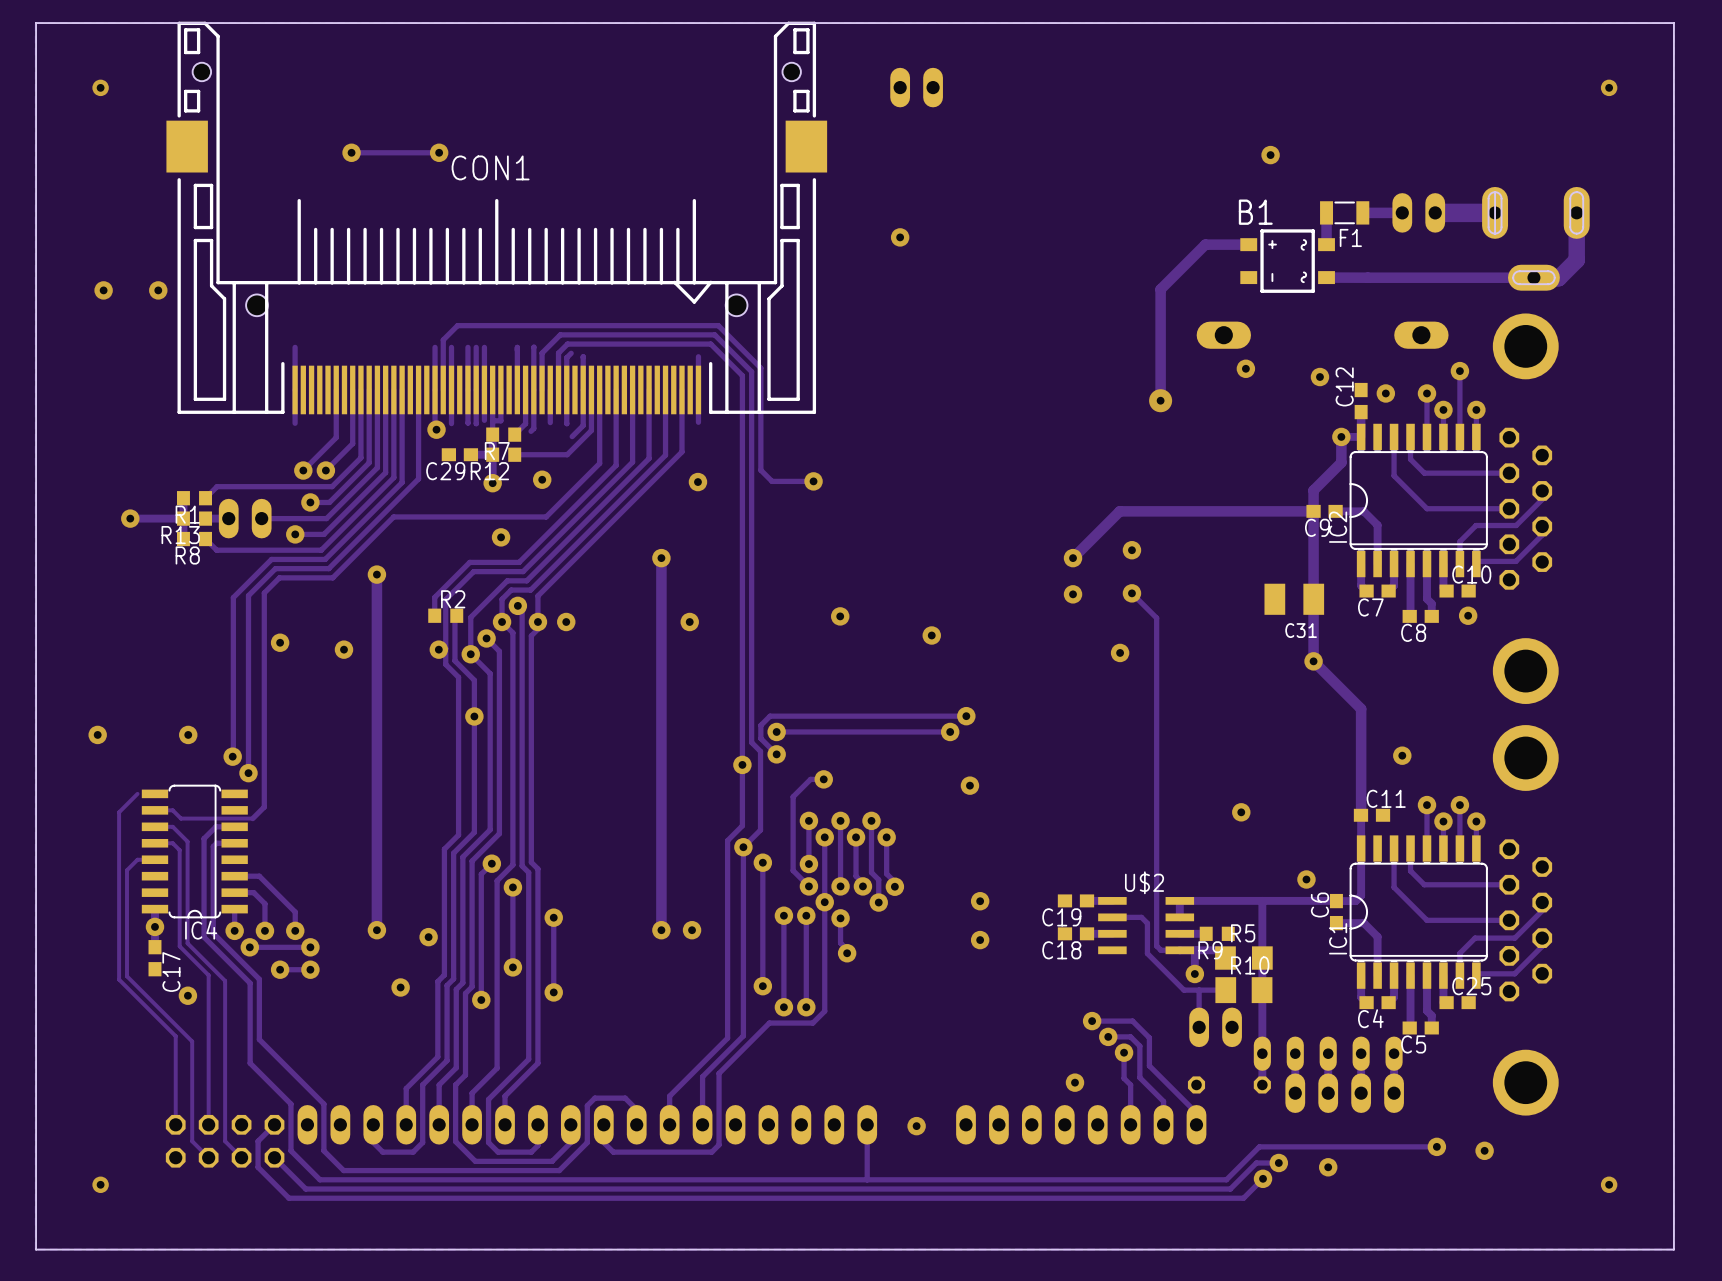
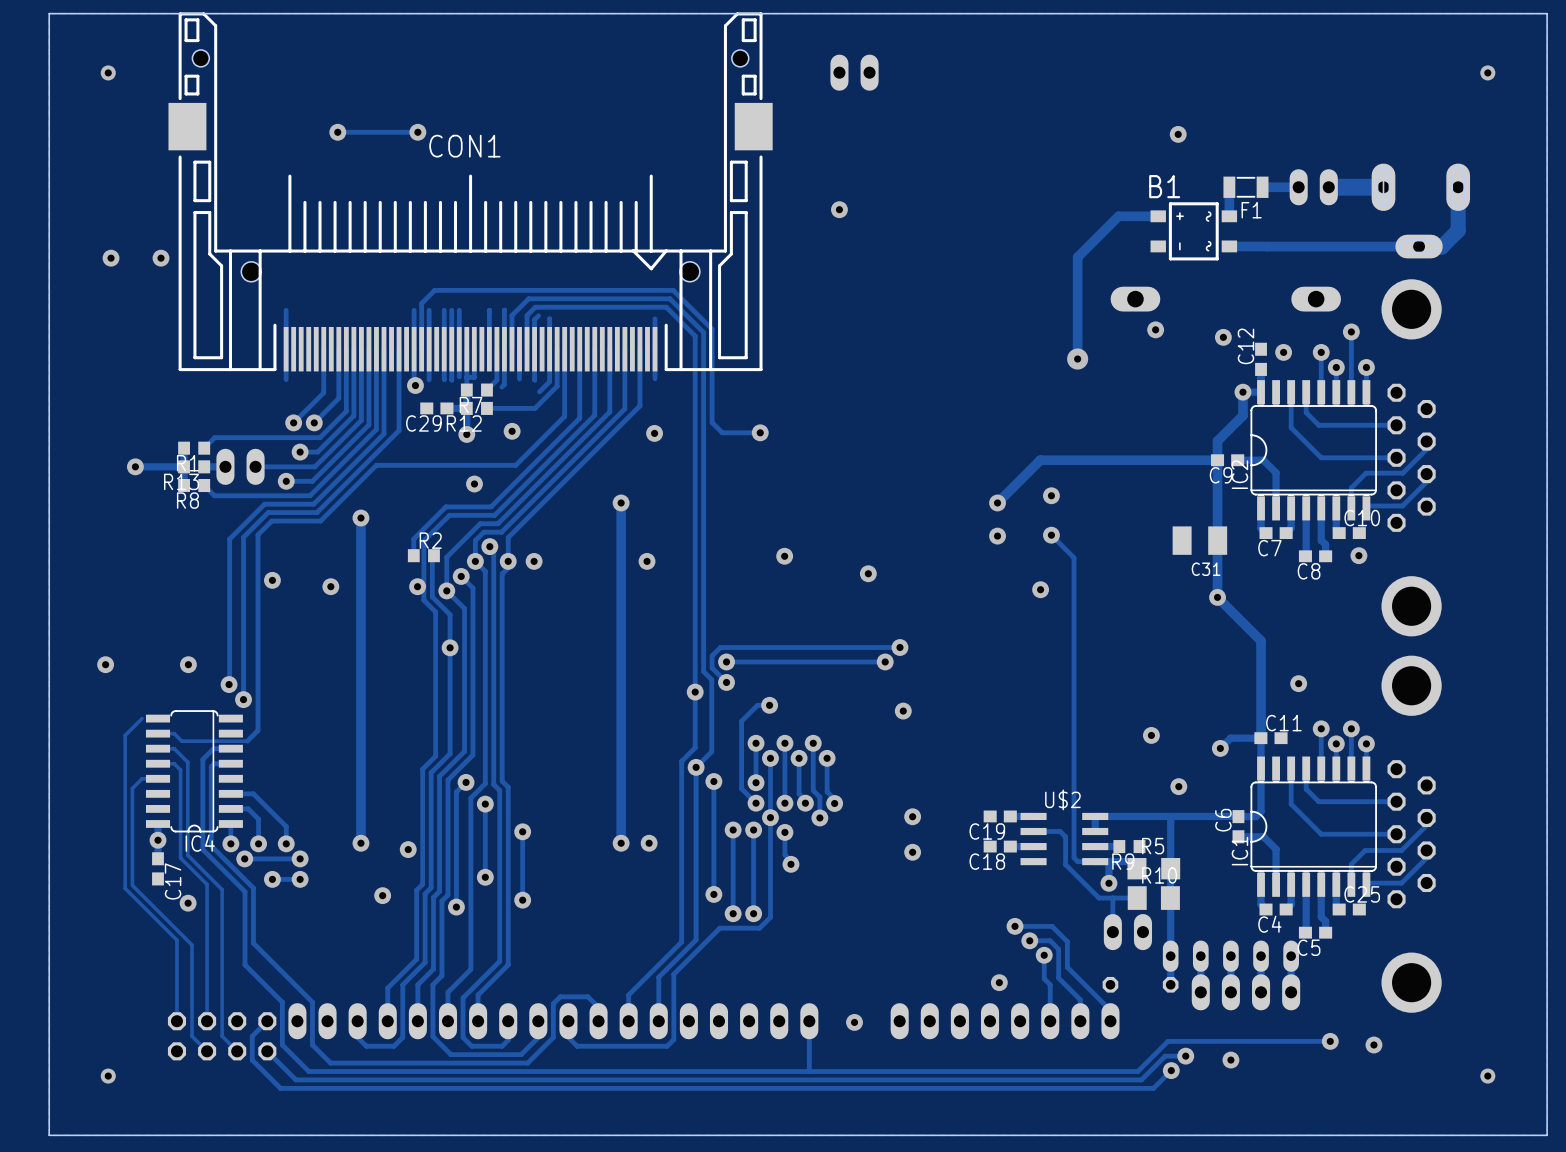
track: none -> (1260, 738) (1230, 738) (1220, 748)
via: none -> (1220, 748)
via: none -> (1178, 786)
via: (1306, 879) -> none

